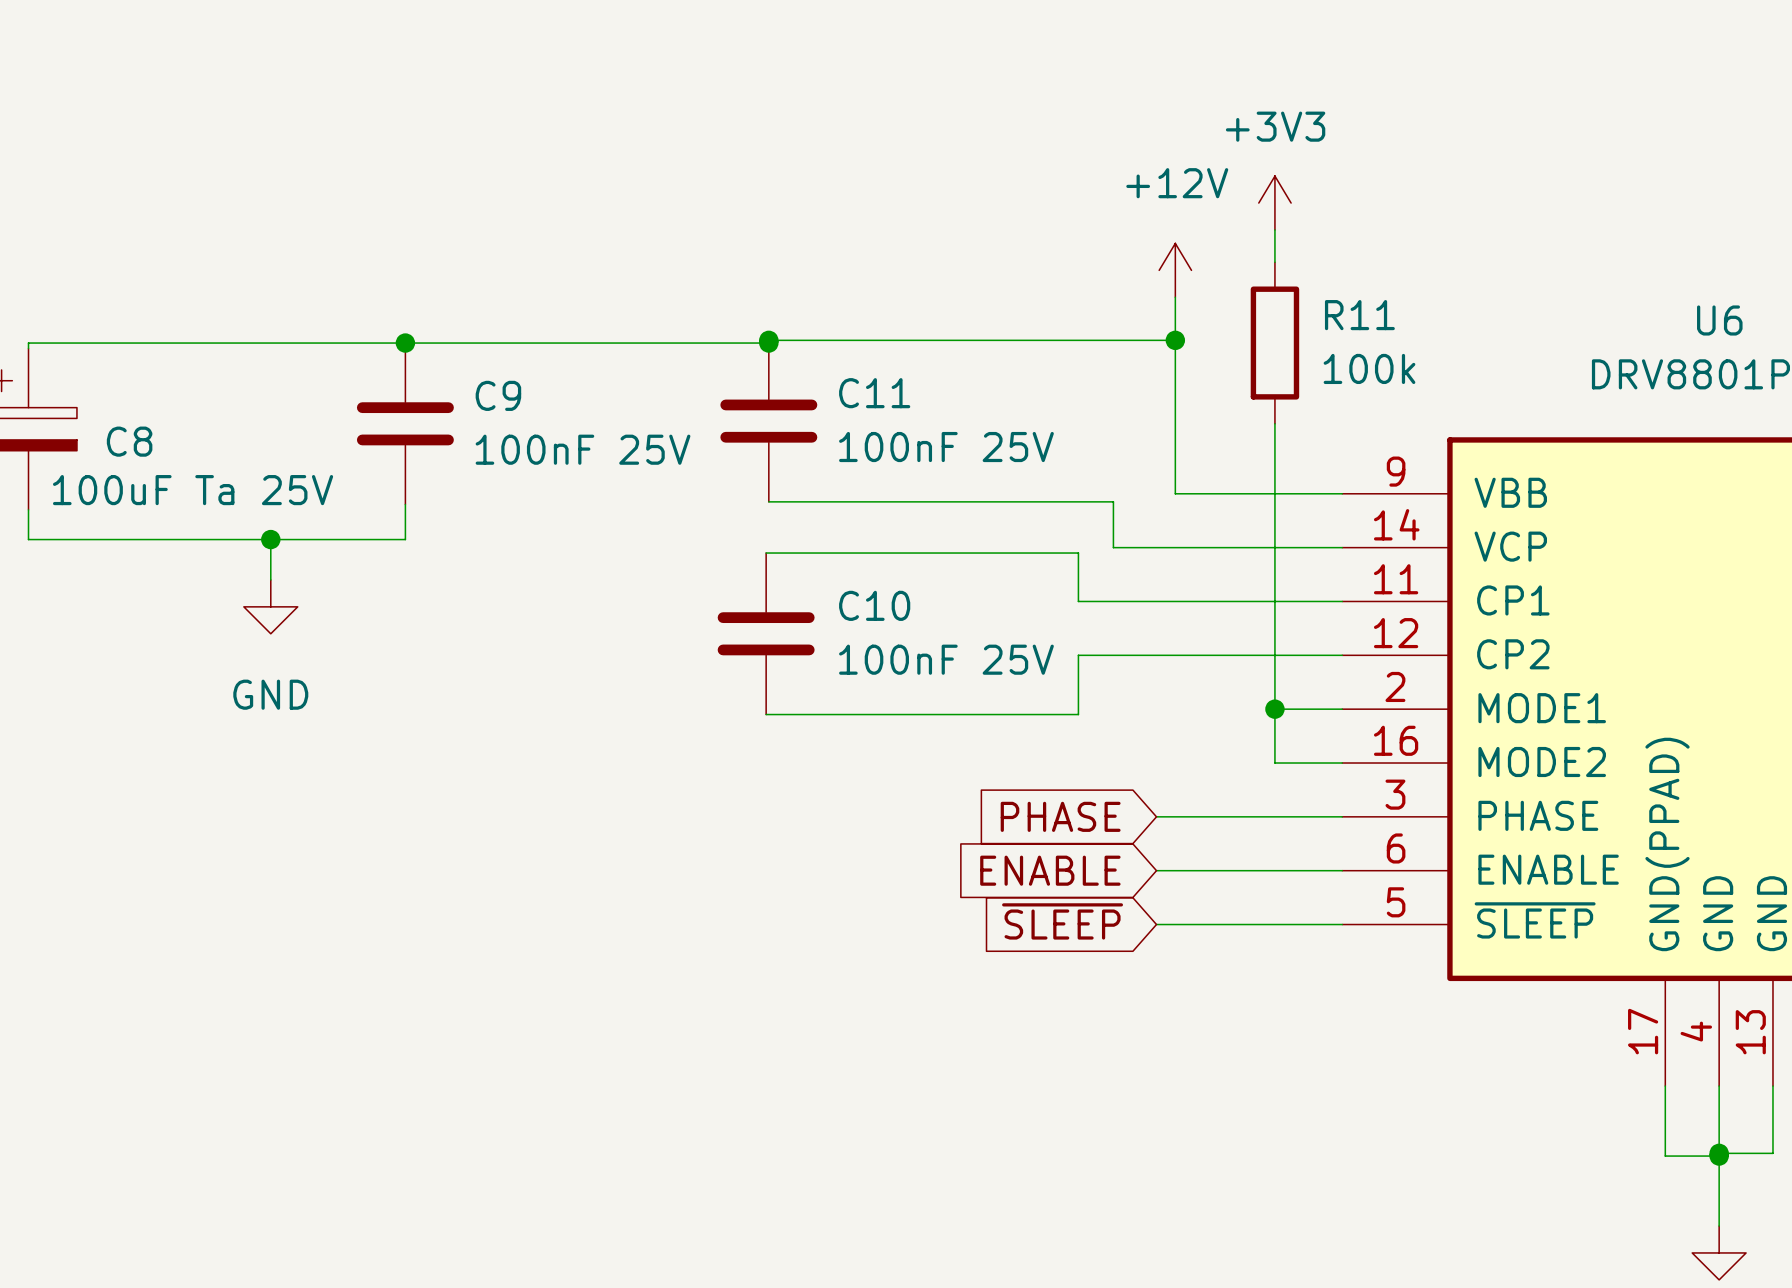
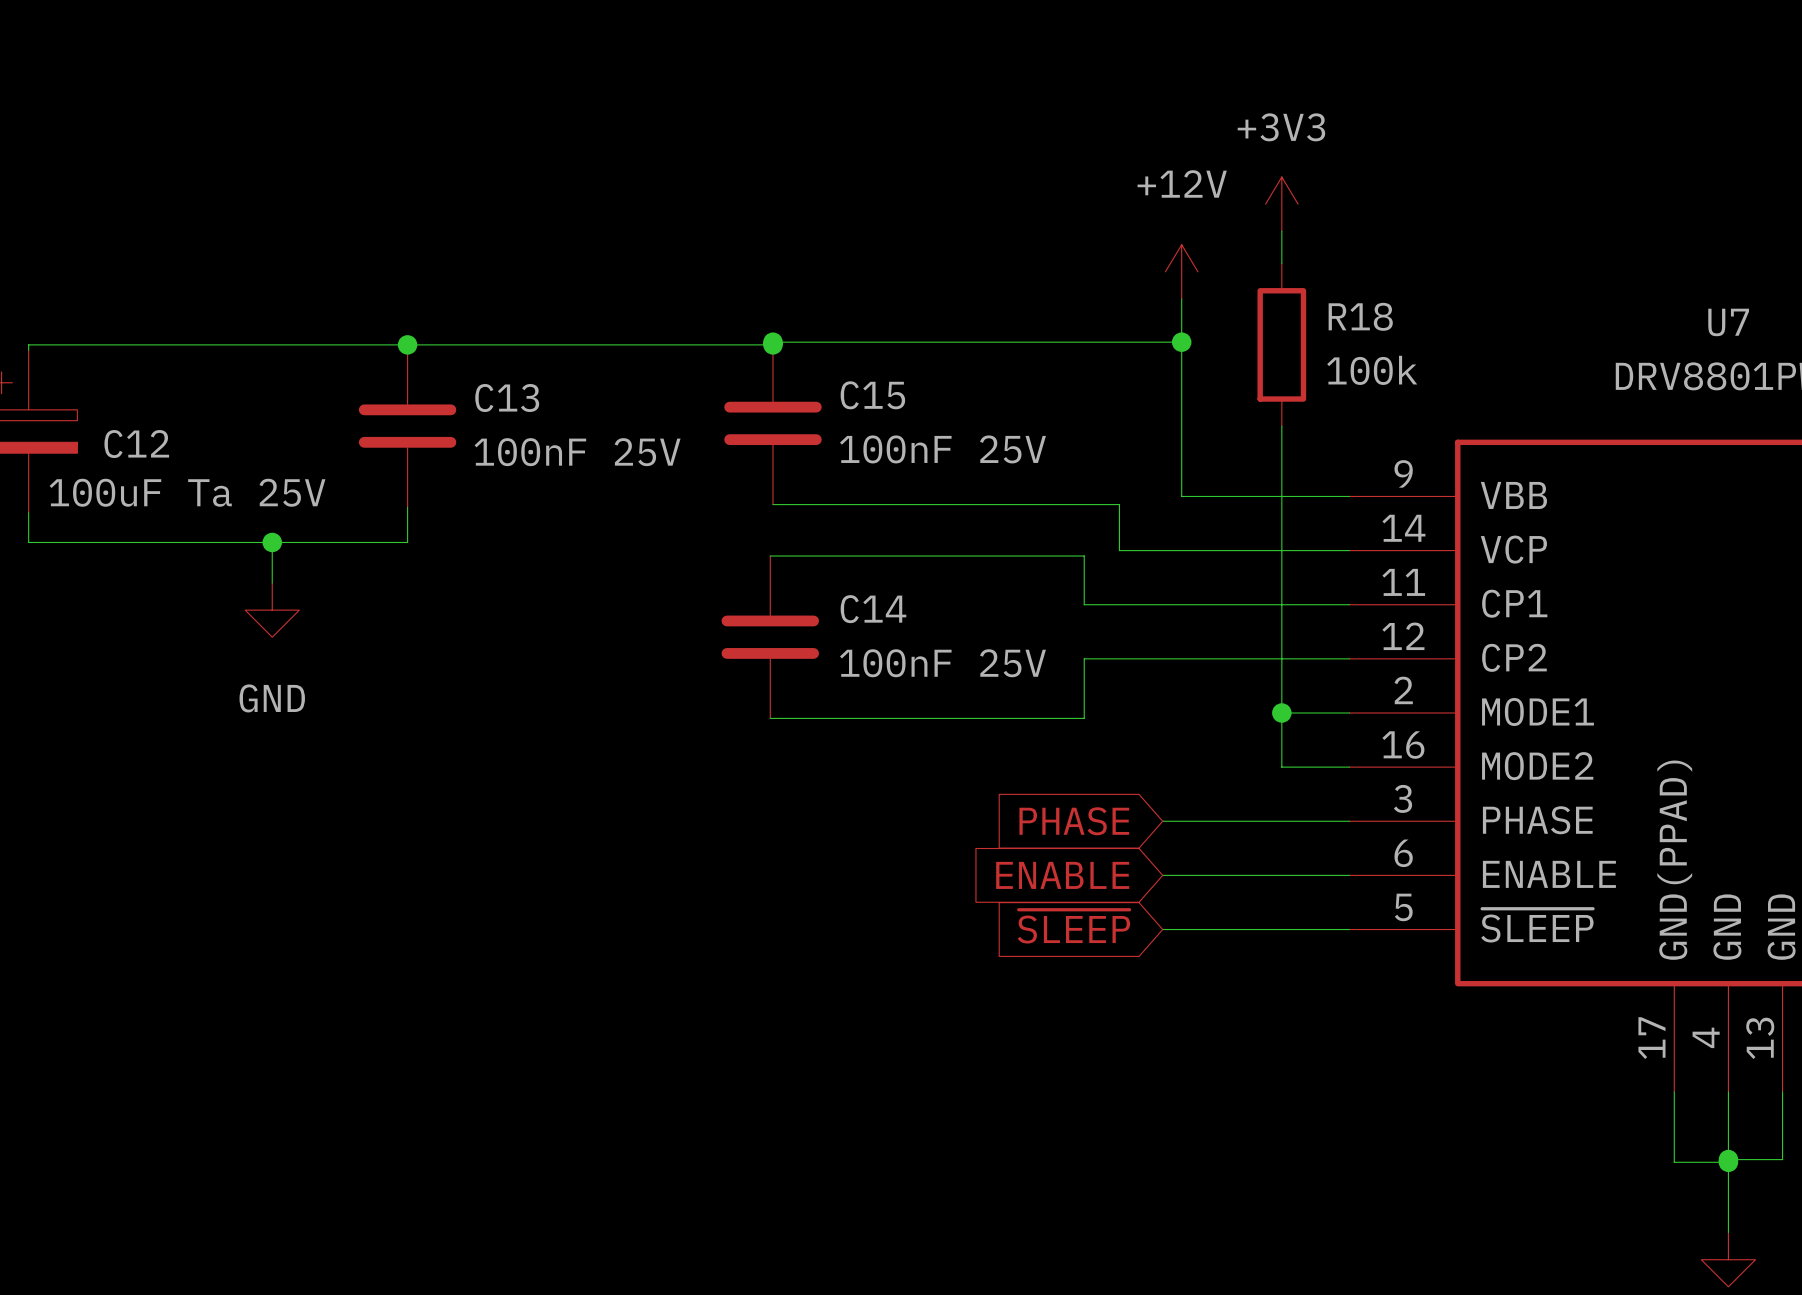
R11 name: R11 (1359, 315) -> R18 (1360, 316)
U6 name: U6 (1719, 320) -> U7 (1728, 322)
C11 name: C11 (874, 393) -> C15 (872, 395)
C9 name: C9 (498, 395) -> C13 (507, 398)
C8 name: C8 (129, 441) -> C12 (136, 444)
C10 name: C10 (874, 605) -> C14 (873, 609)

